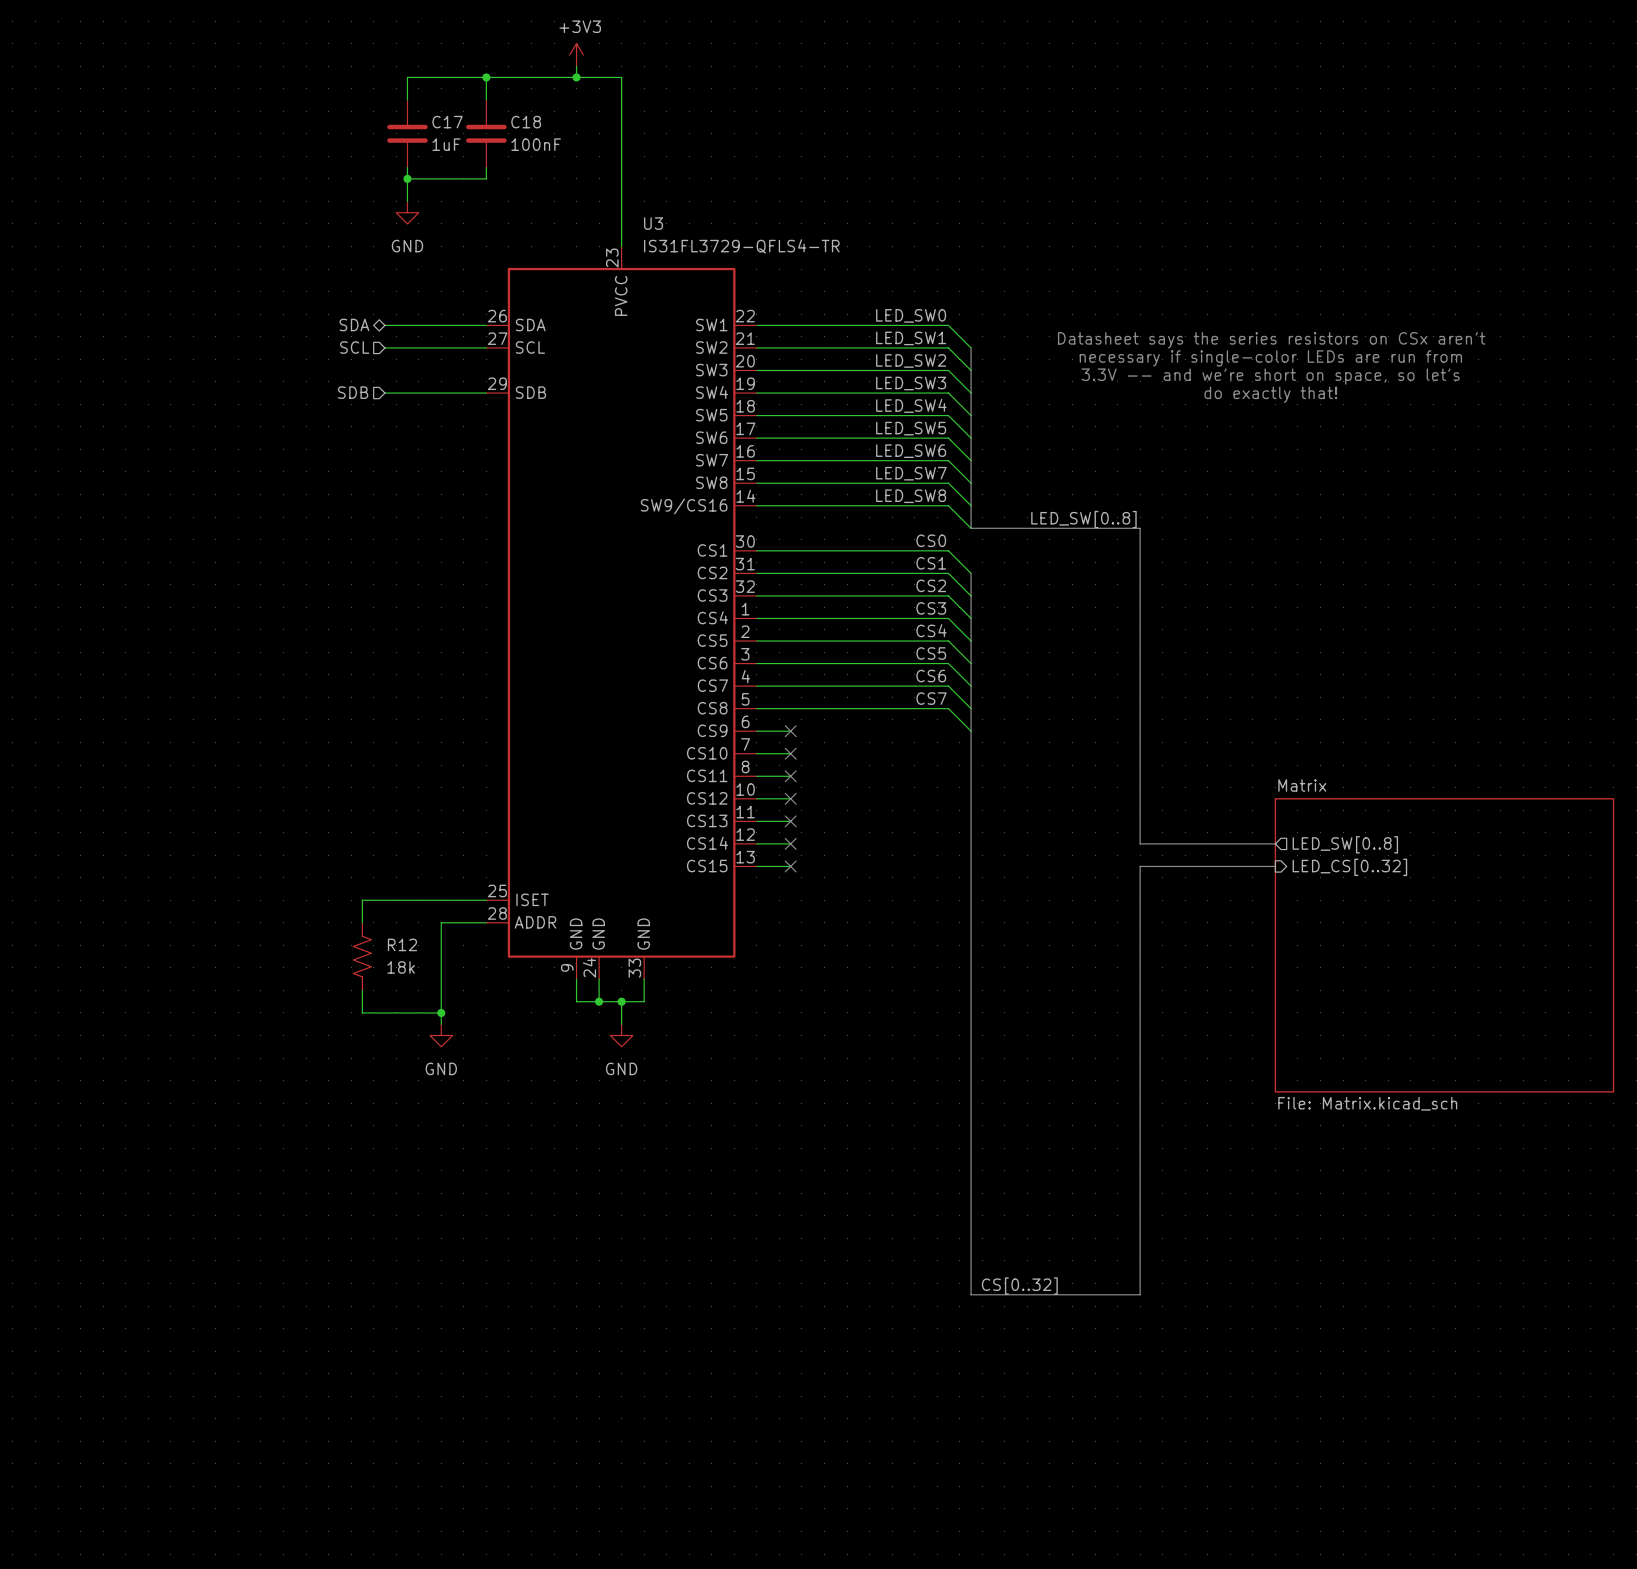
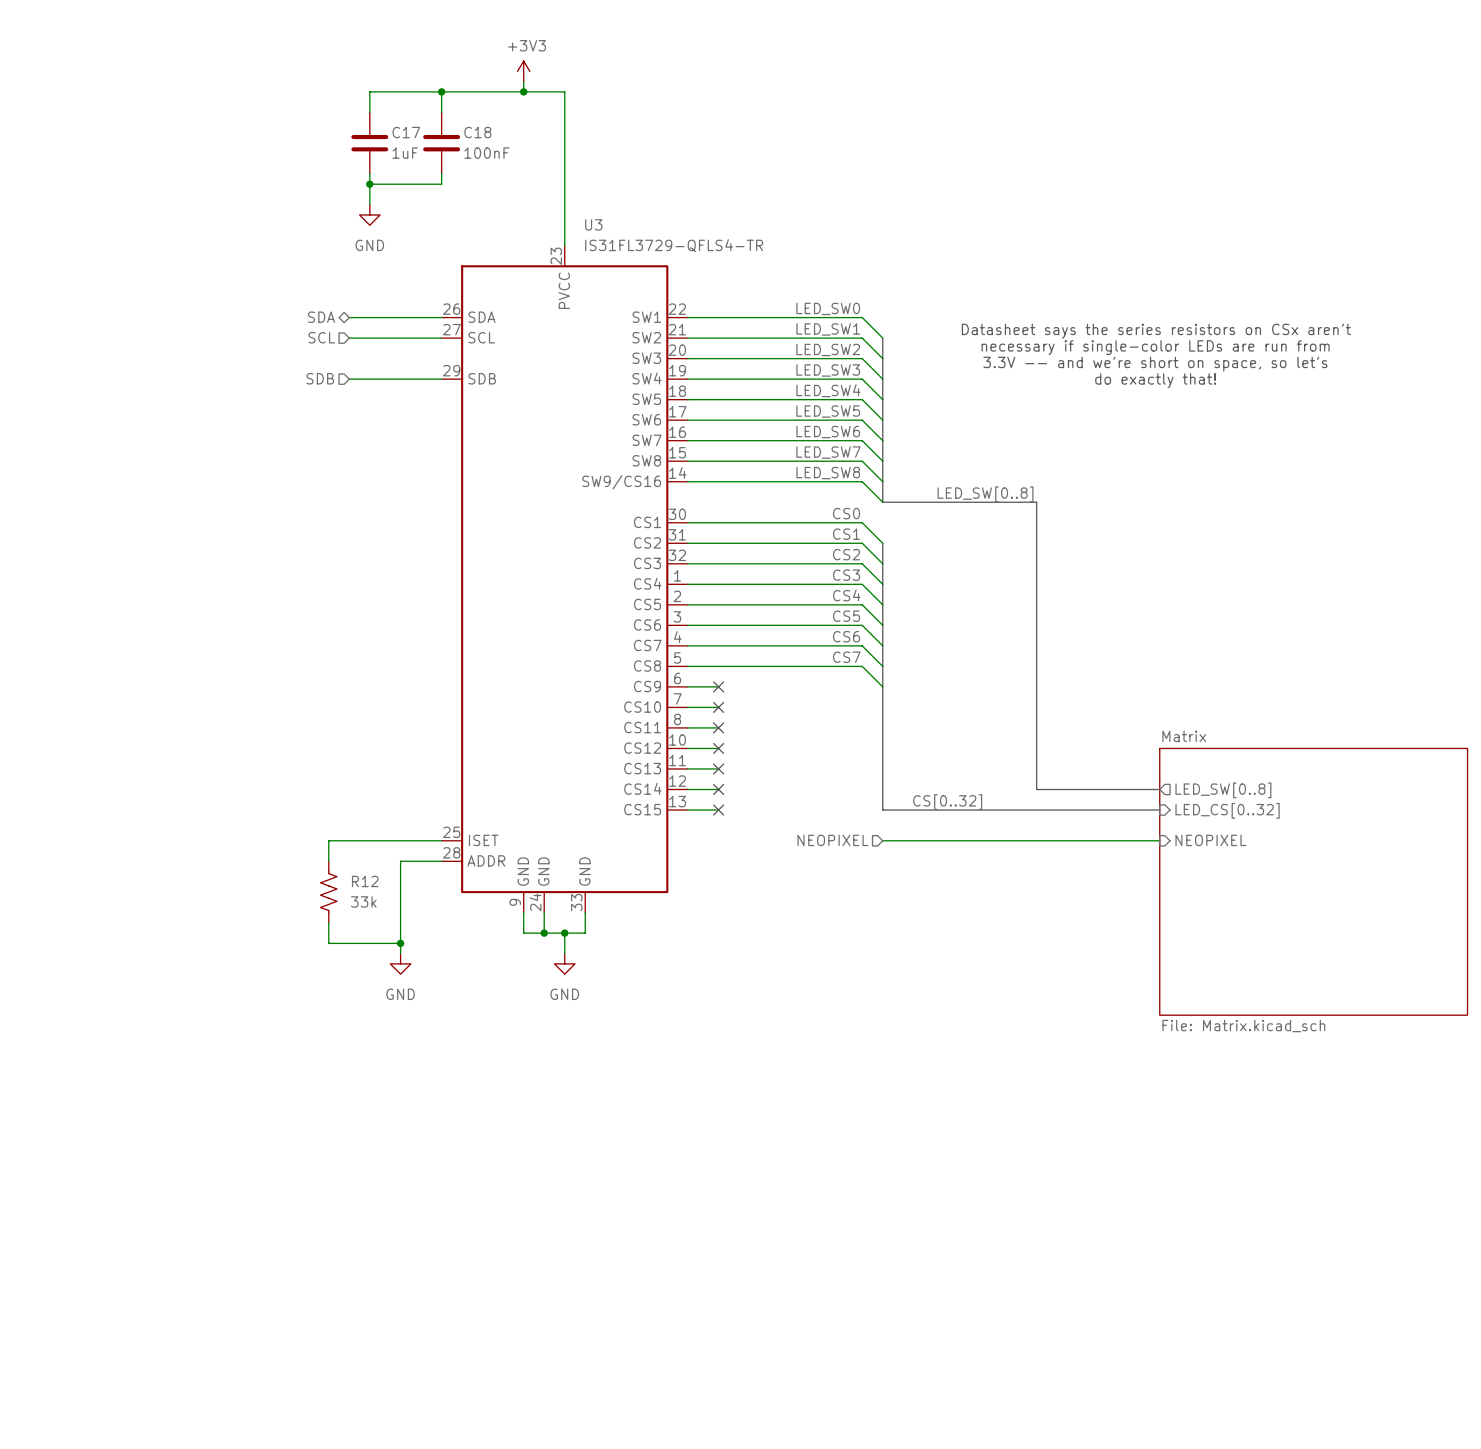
label: none -> CS[0..32] (947, 802)
bus: (971, 866) (971, 1294) (1140, 1294) (1140, 866) -> (882, 810) (1036, 810)
hierarchical label: none -> NEOPIXEL (833, 840)
sheet pin: none -> NEOPIXEL (1210, 840)
wire: none -> (882, 840) (1159, 840)
R12 value: 18k (401, 967) -> 33k (363, 901)
label: CS[0..32] (1019, 1286) -> none

